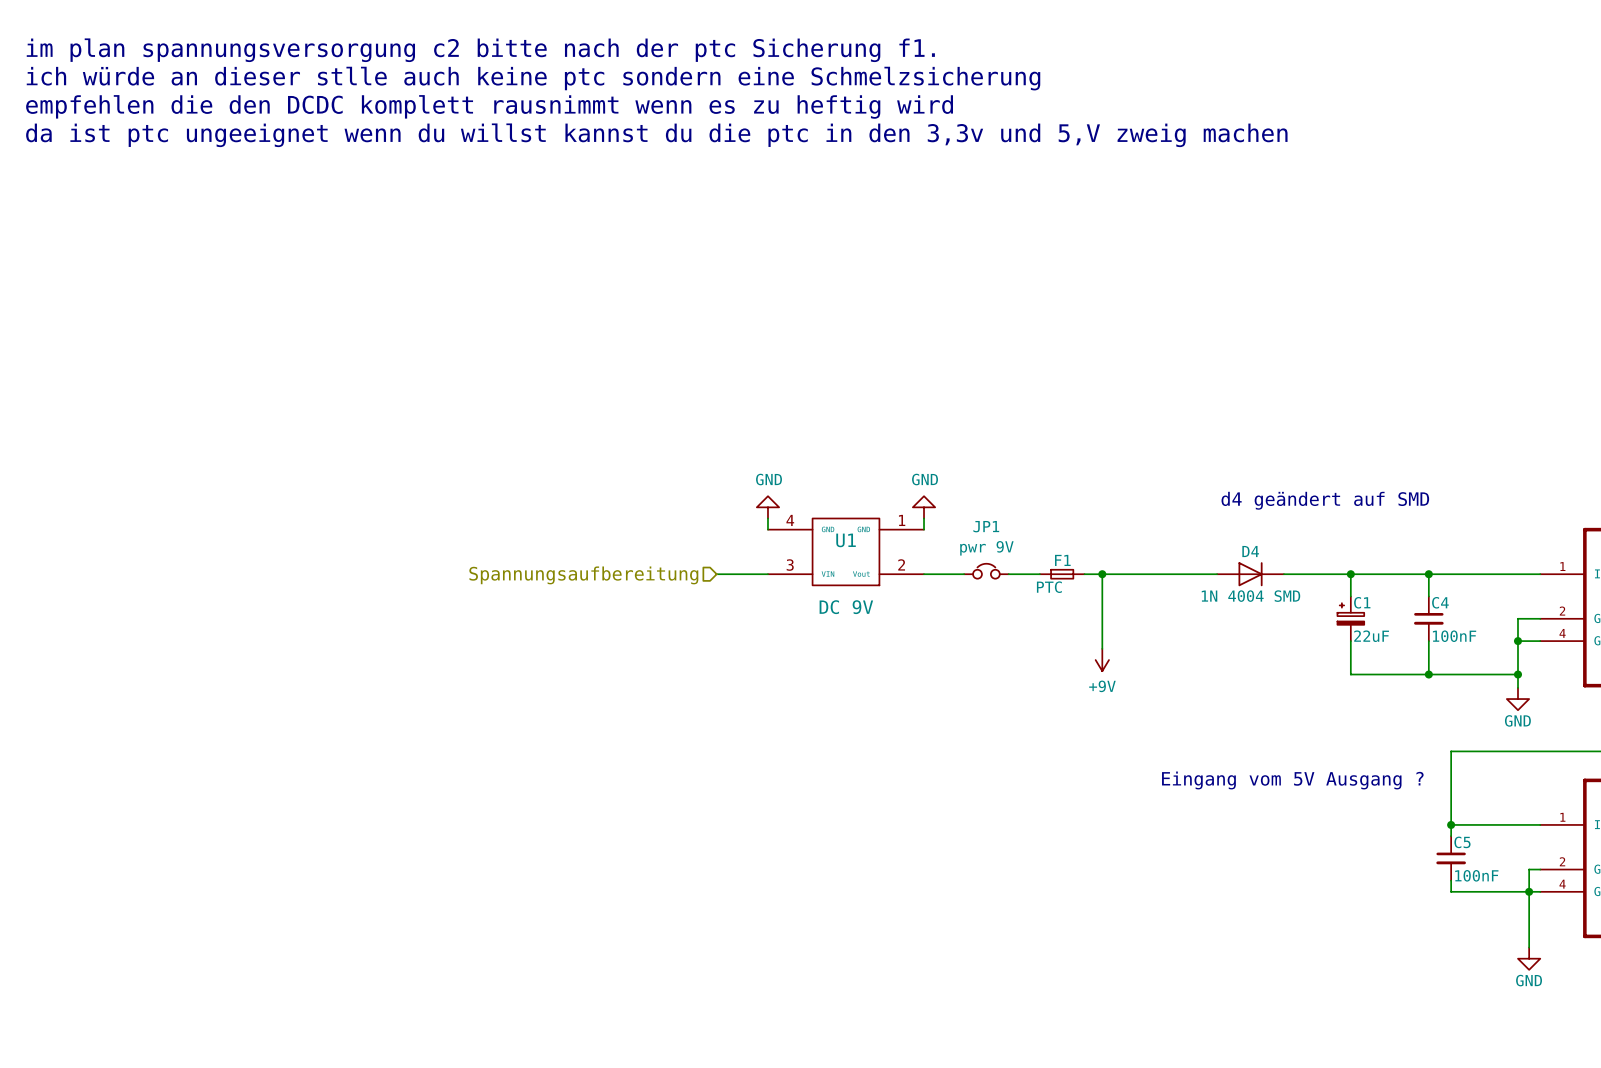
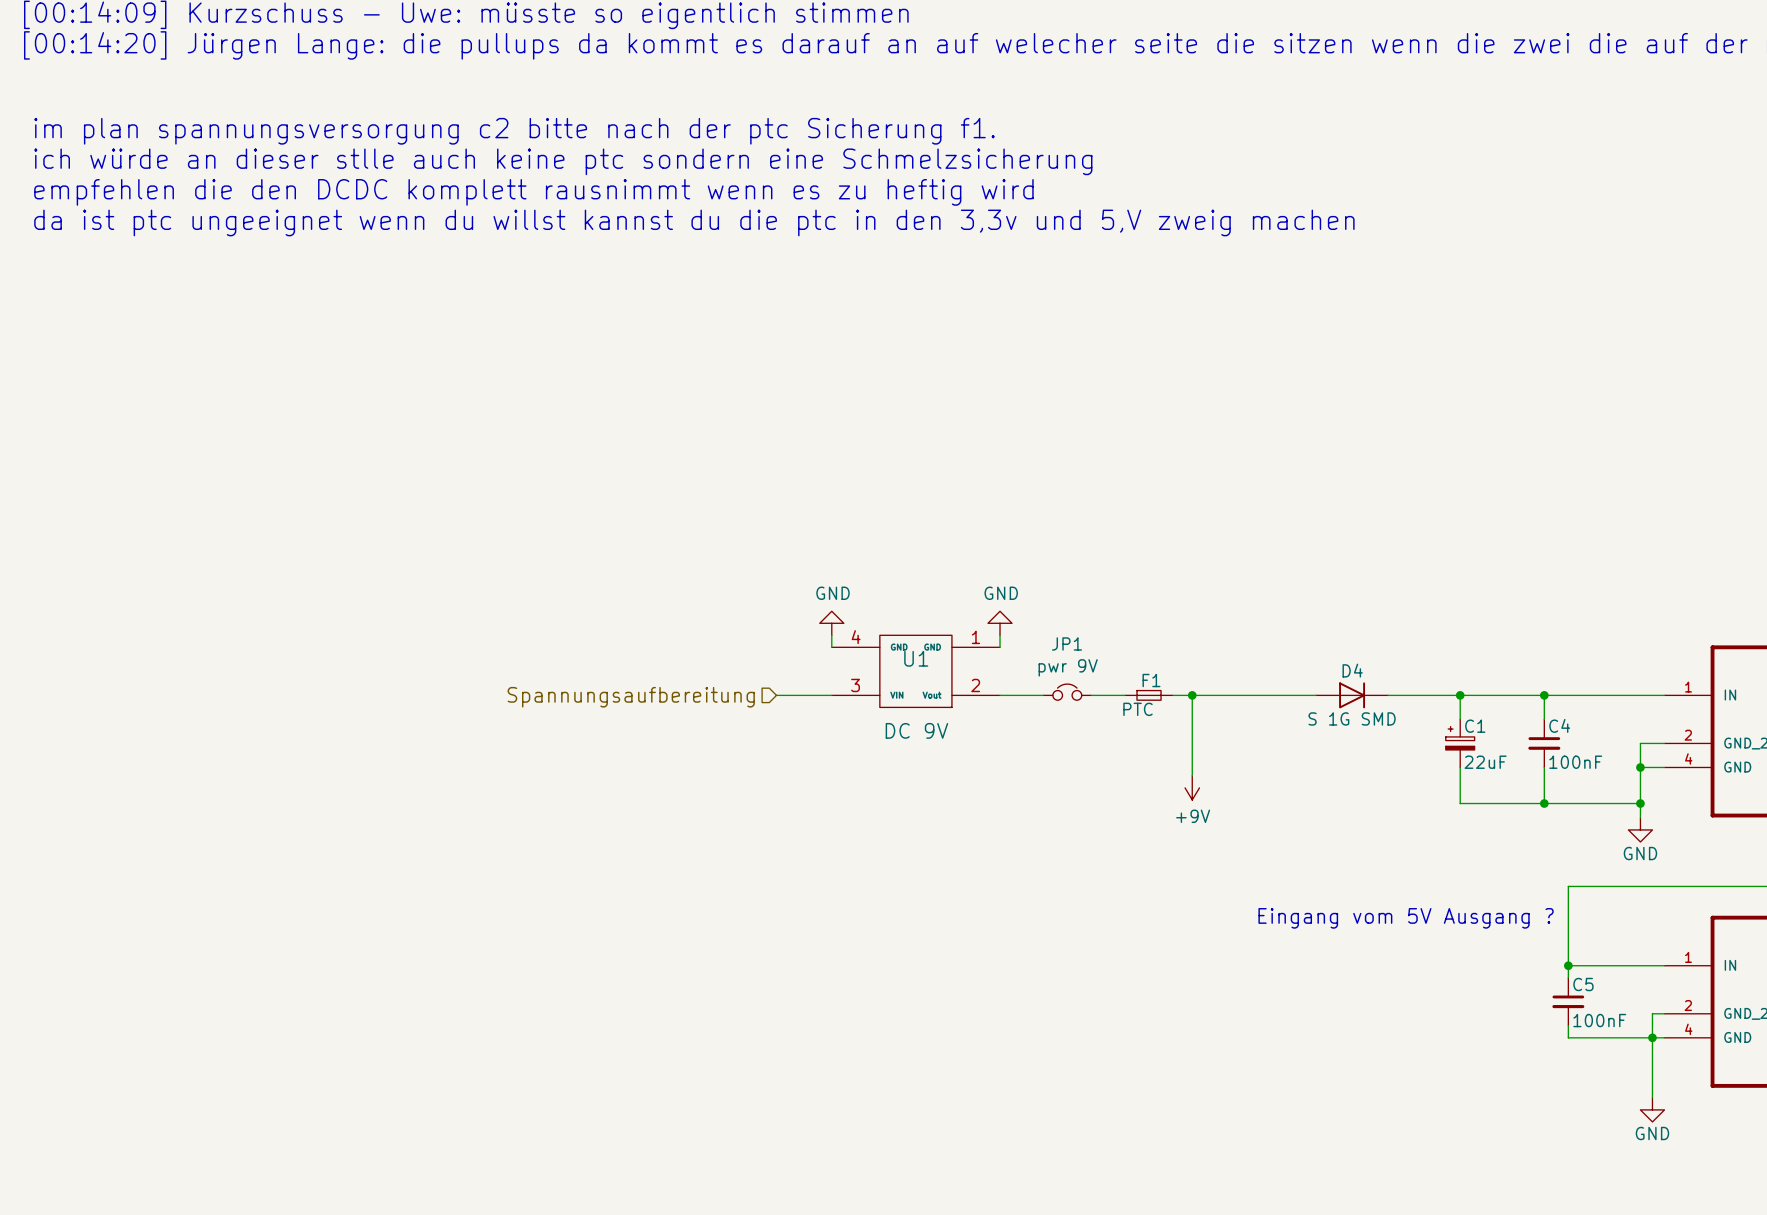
text: d4 geändert auf SMD (1325, 500) -> none
D4 value: 1N 4004 SMD (1250, 596) -> S 1G SMD (1352, 718)

